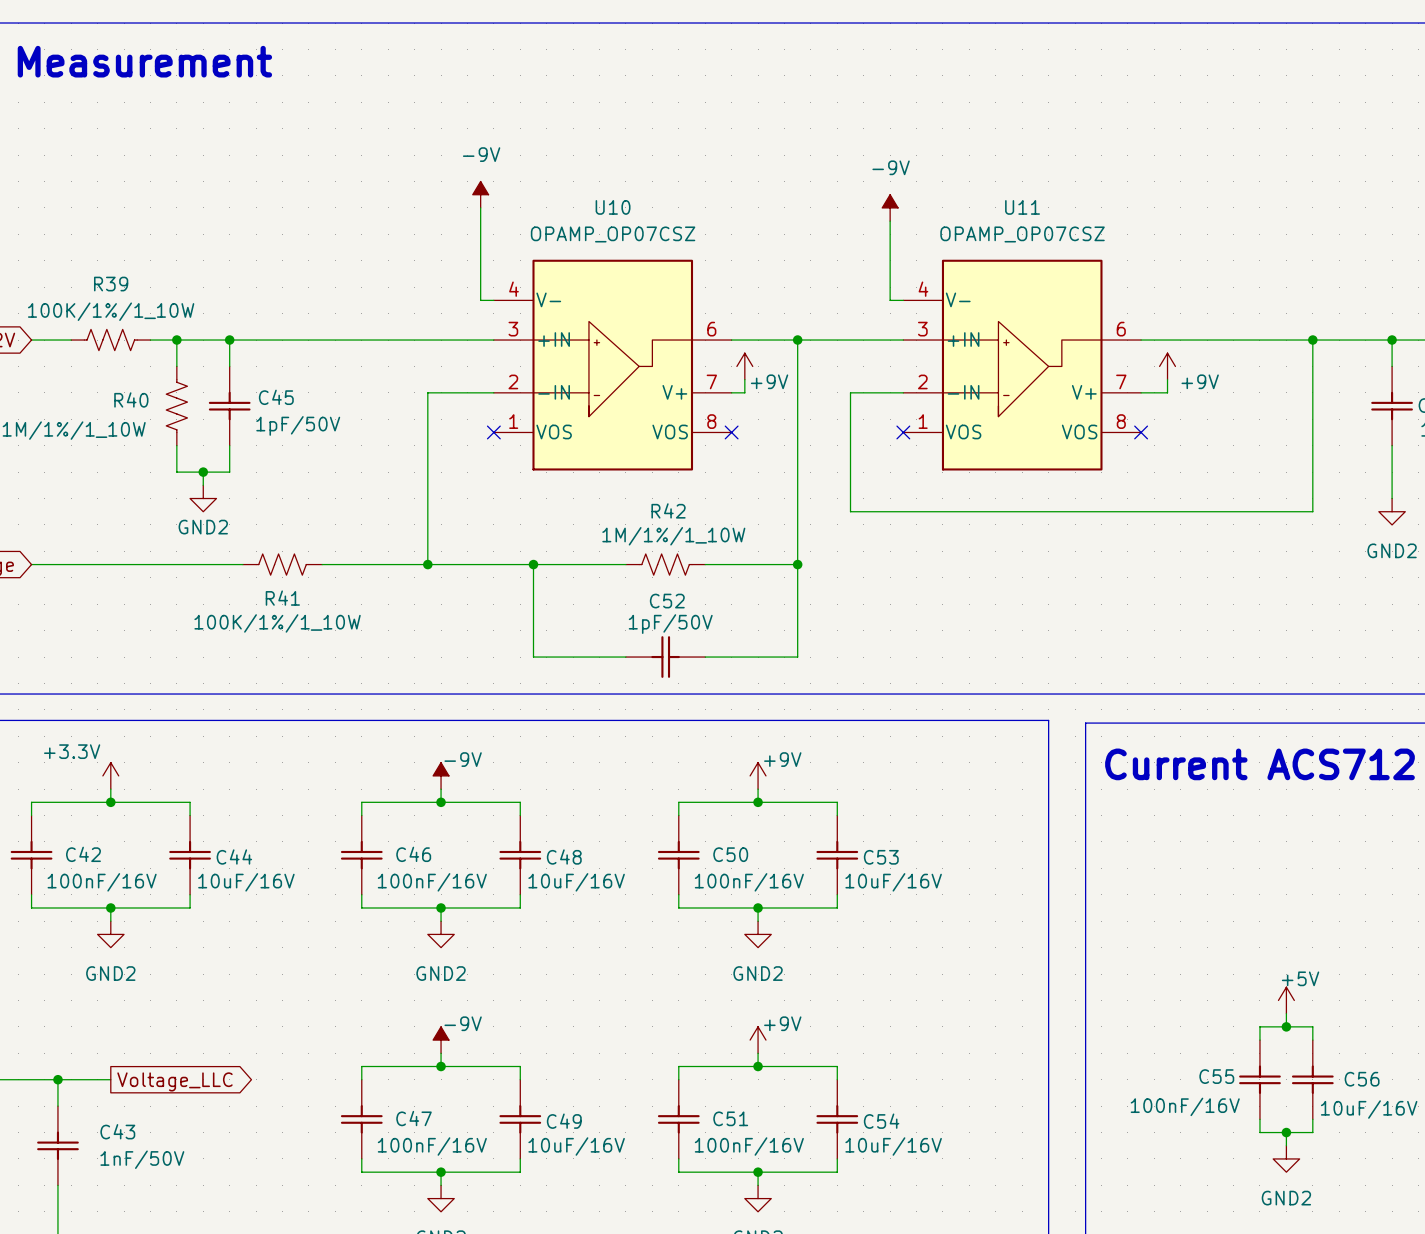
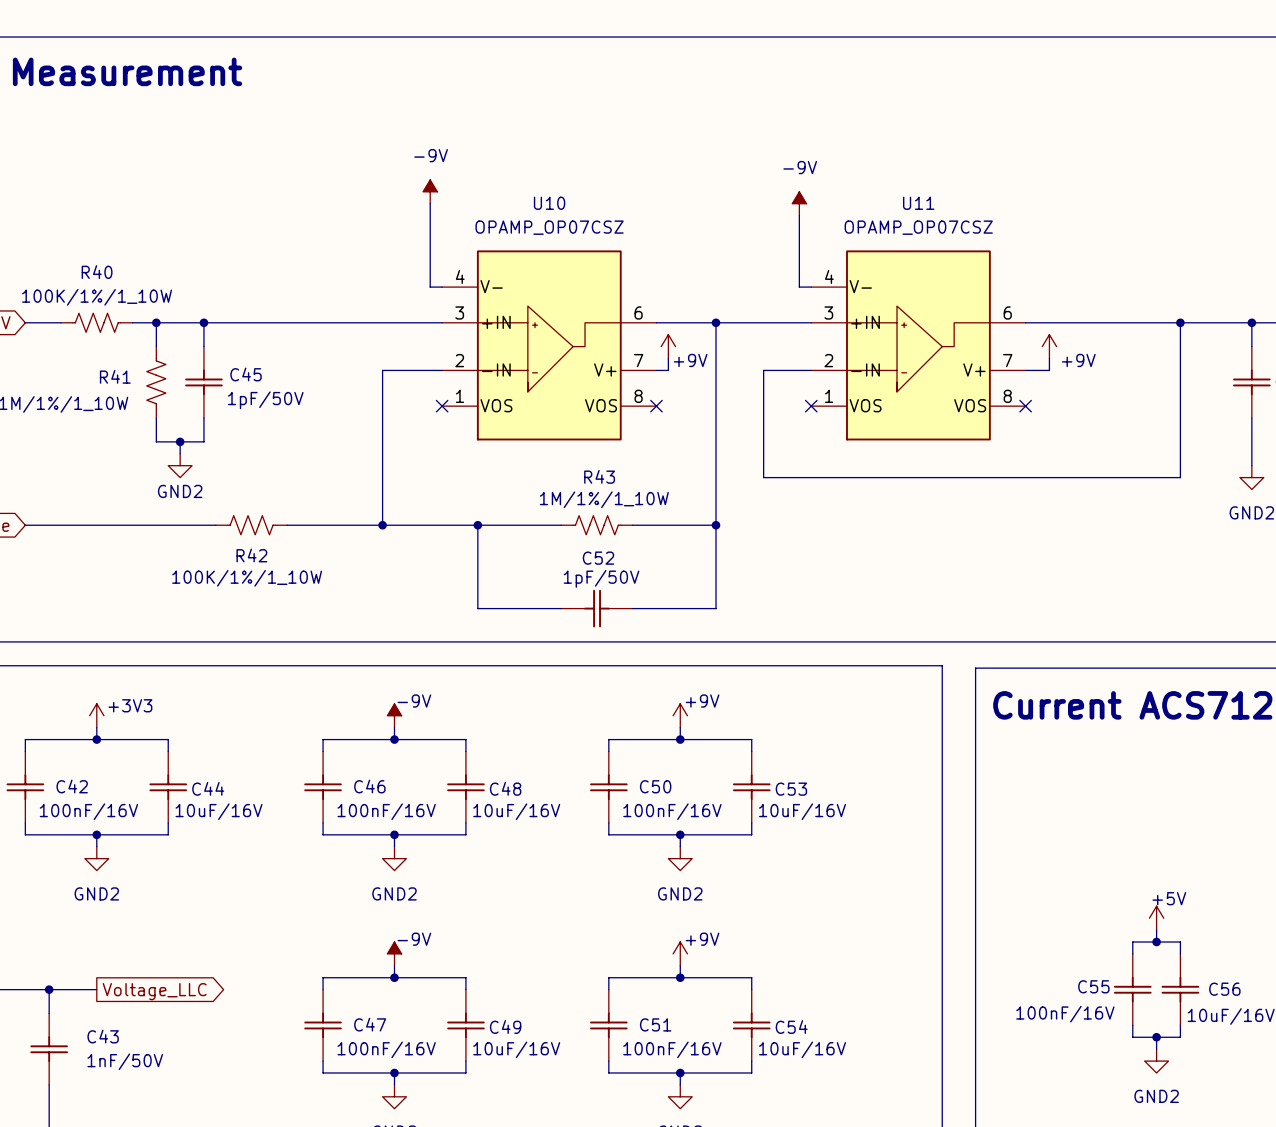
R39 name: R39 (111, 284) -> R40 (97, 272)
R40 name: R40 (131, 399) -> R41 (115, 376)
R42 name: R42 (668, 510) -> R43 (599, 476)
R41 name: R41 (282, 598) -> R42 (251, 555)
power symbol: +3.3V (110, 775) -> +3V3 (96, 715)

